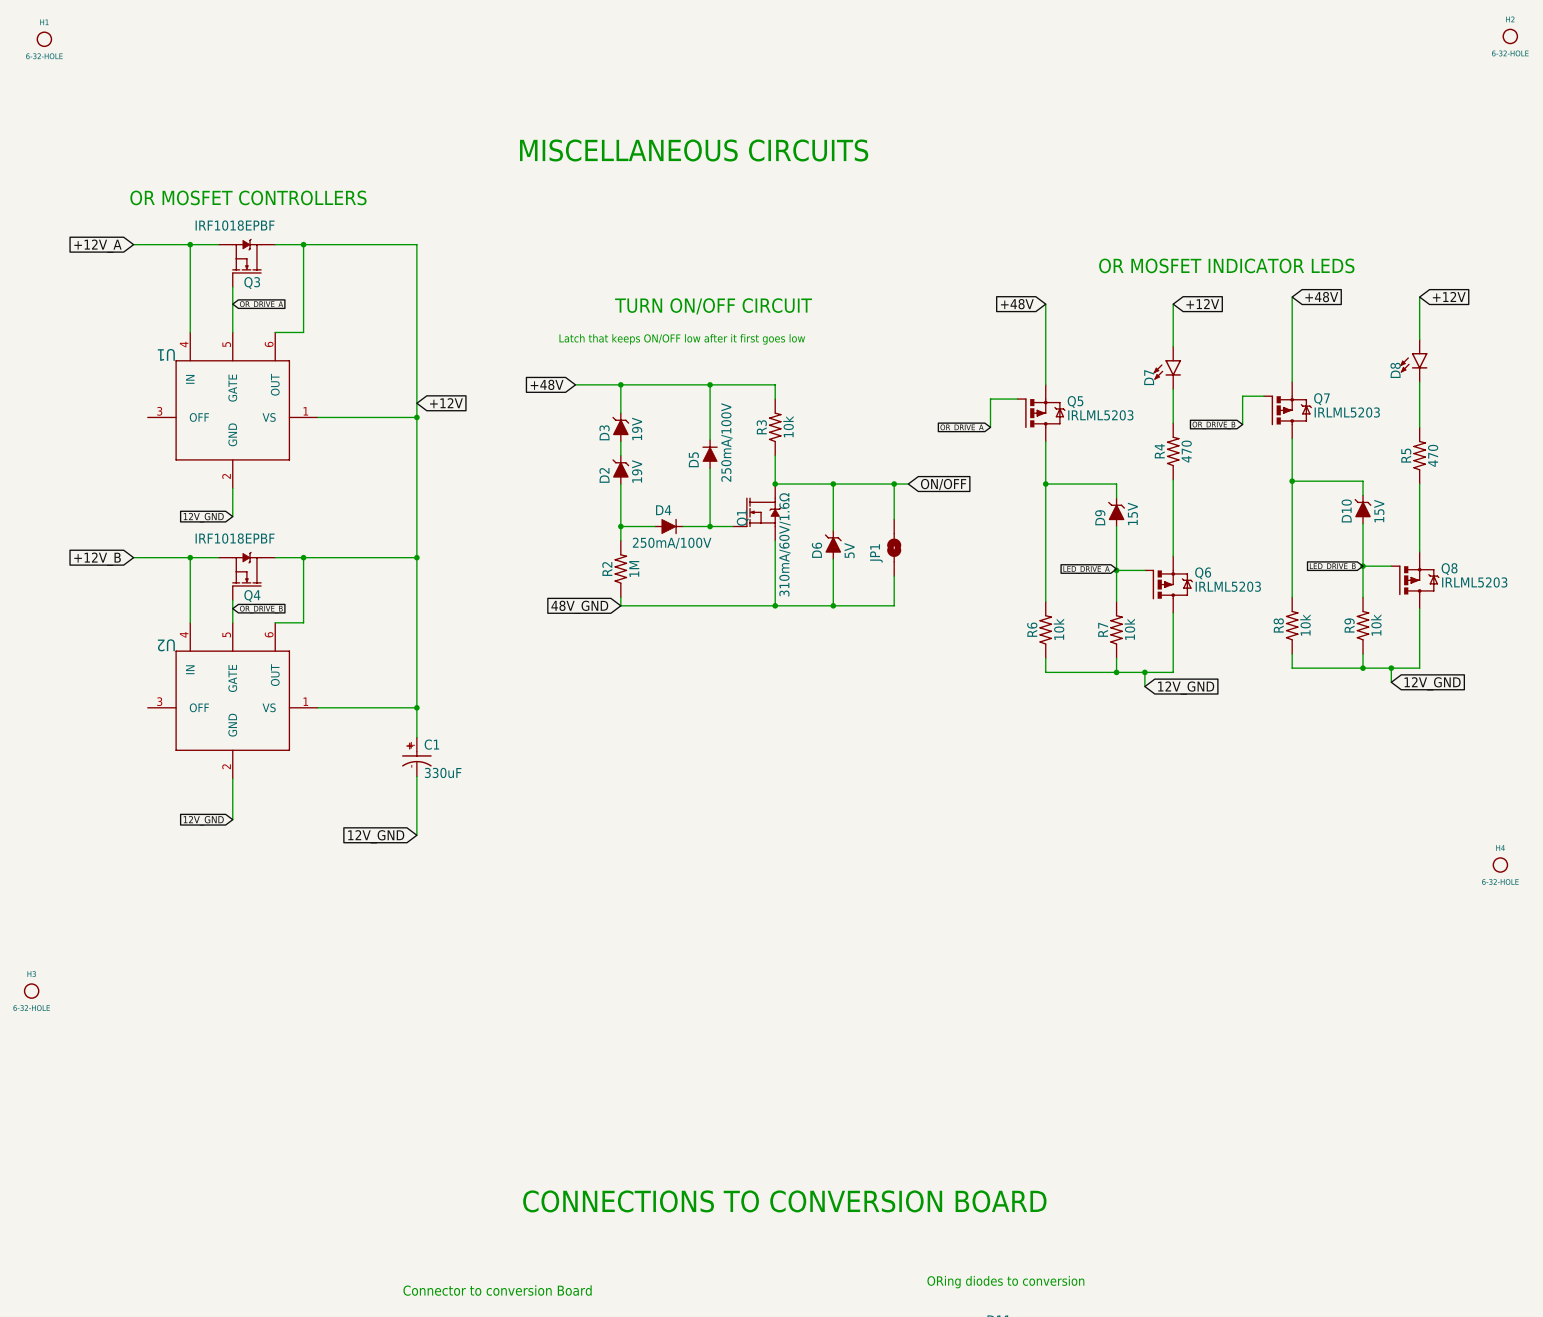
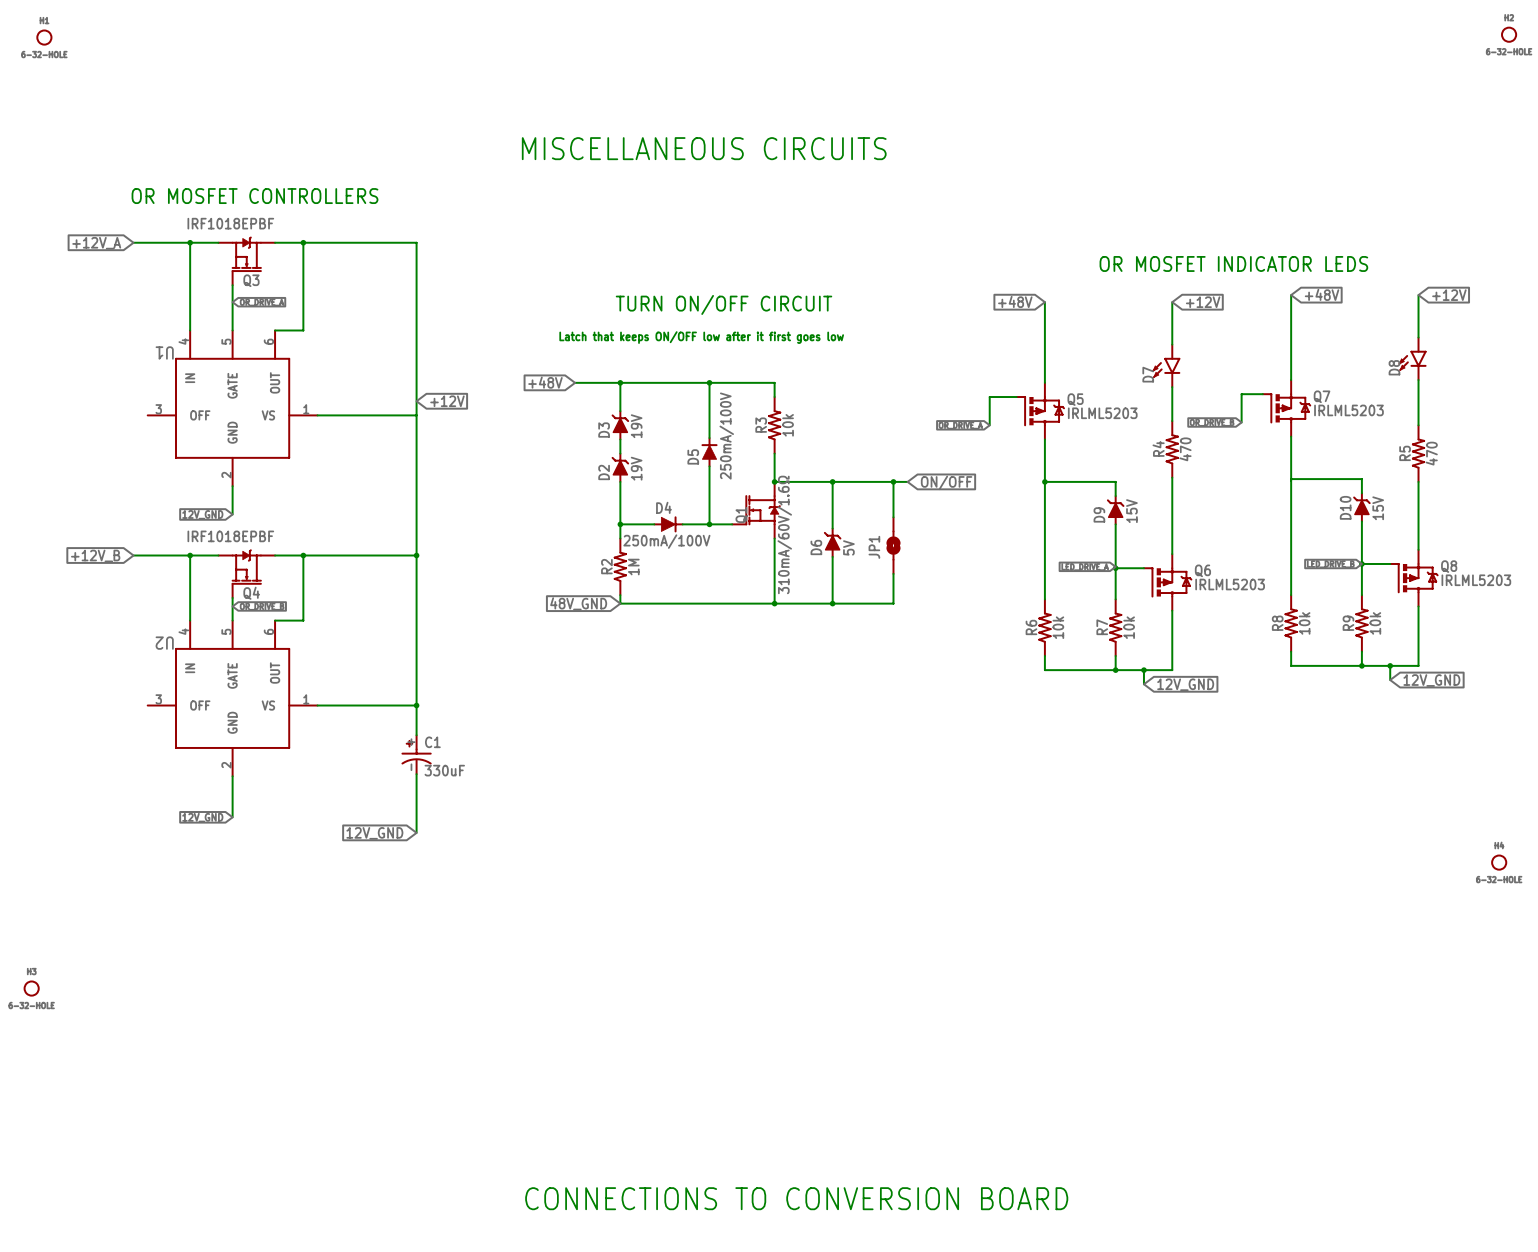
junction: (416, 417) -> none
junction: (1292, 481) -> none

